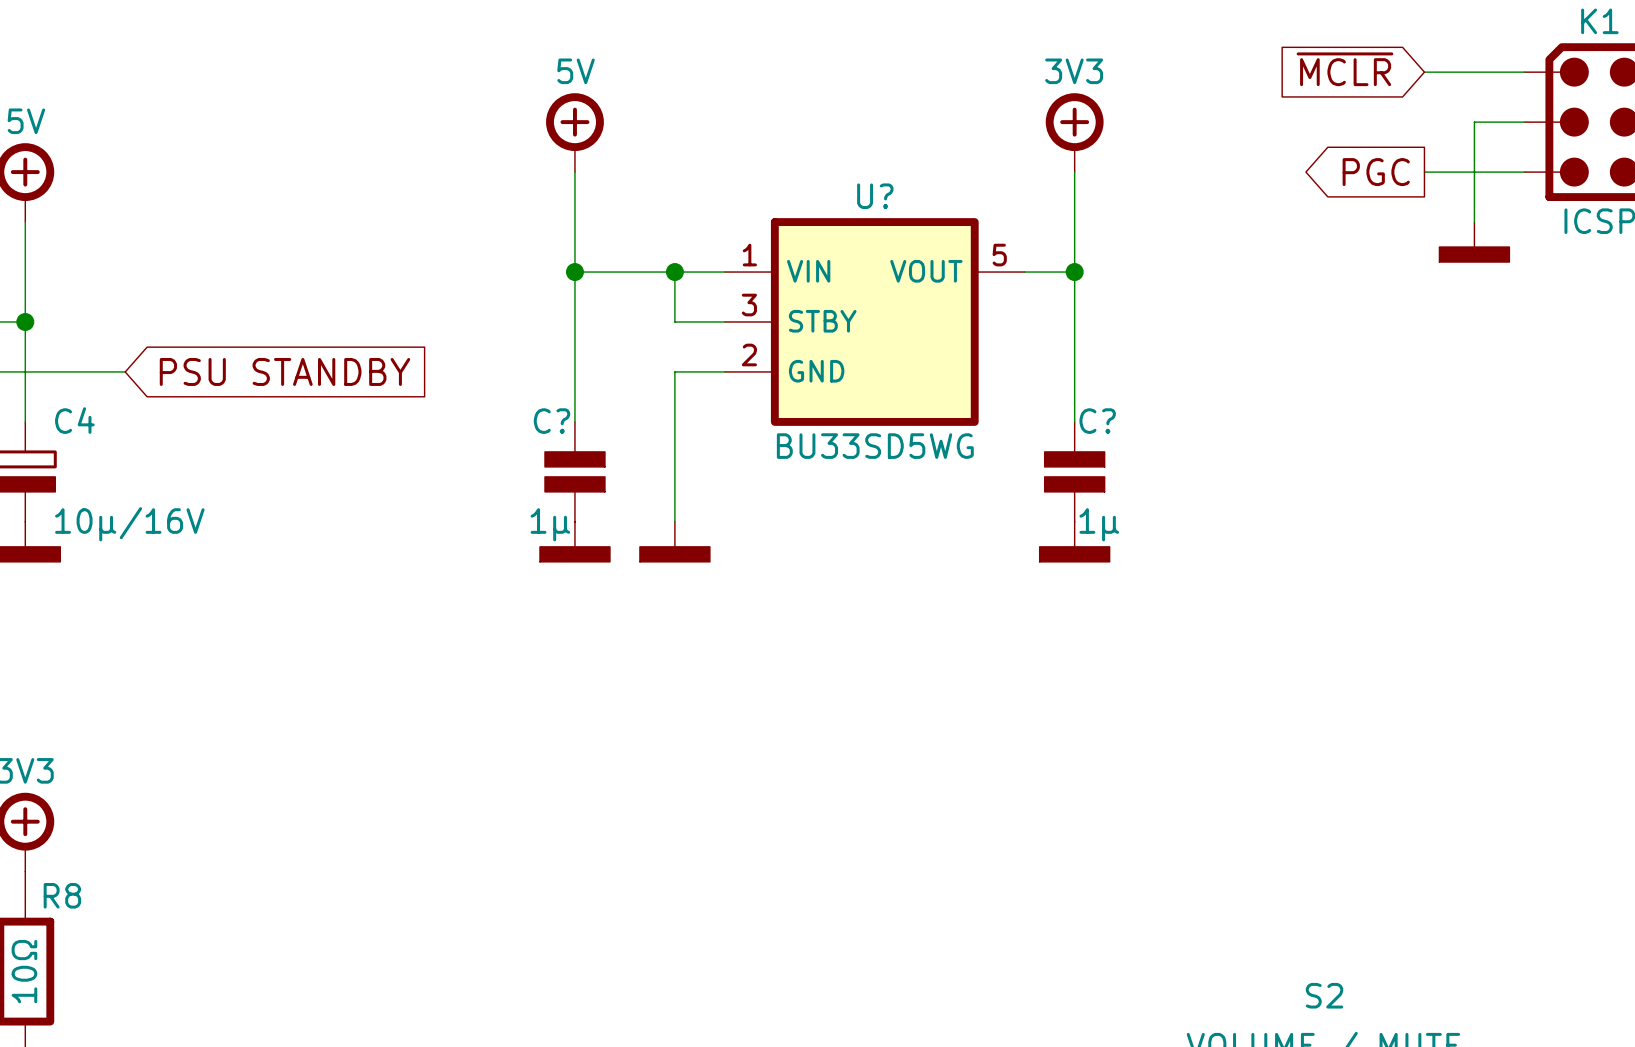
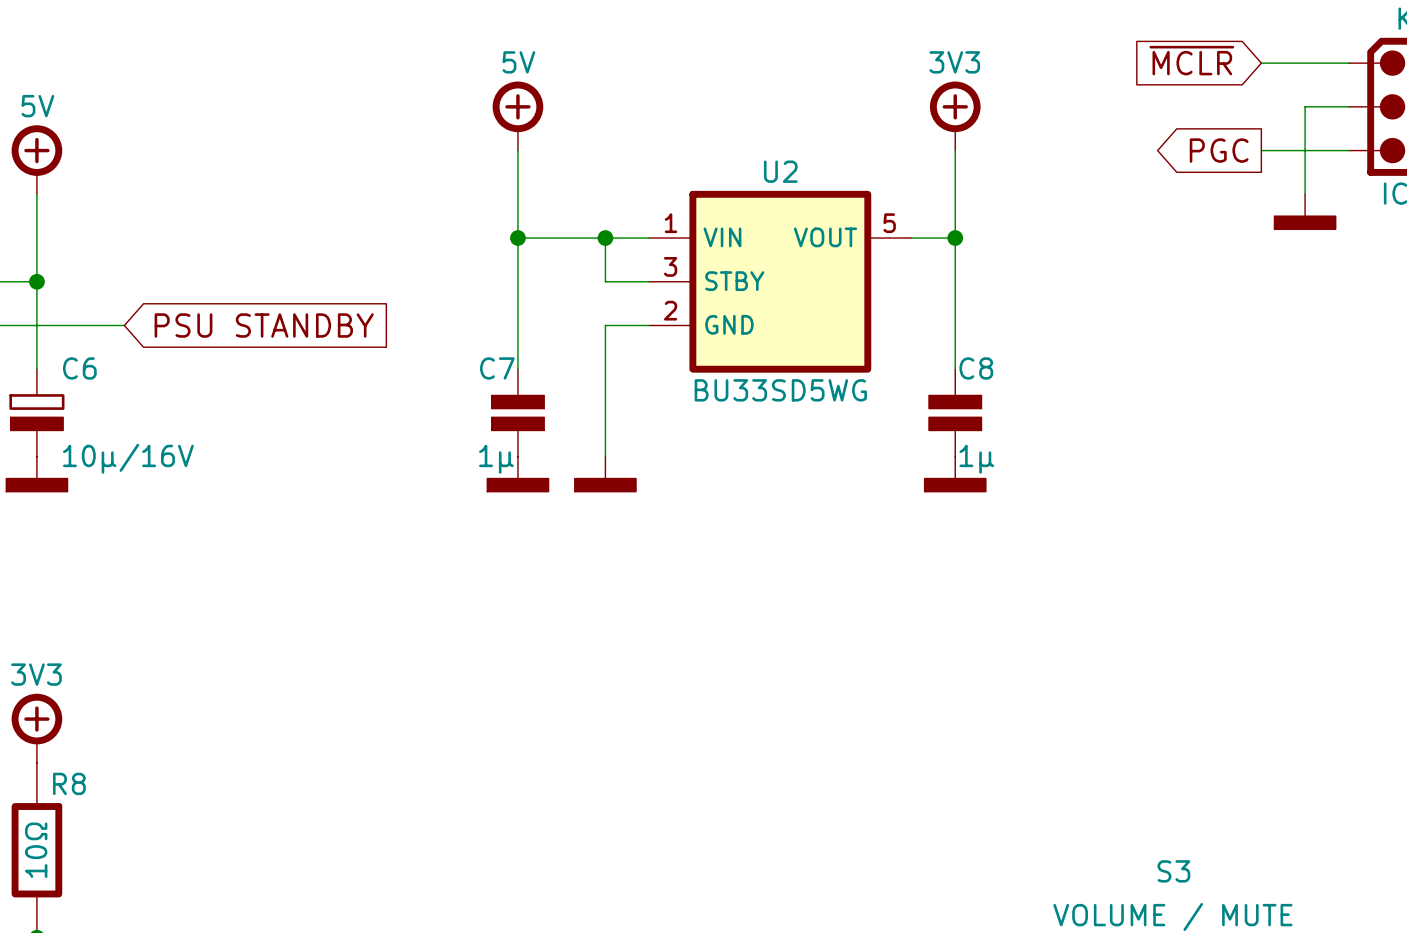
U? name: U? (875, 196) -> U2 (780, 171)
C4 name: C4 (74, 420) -> C6 (79, 368)
C? name: C? (551, 421) -> C7 (497, 368)
C? name: C? (1097, 421) -> C8 (976, 368)
S2 name: S2 (1324, 995) -> S3 (1173, 871)

